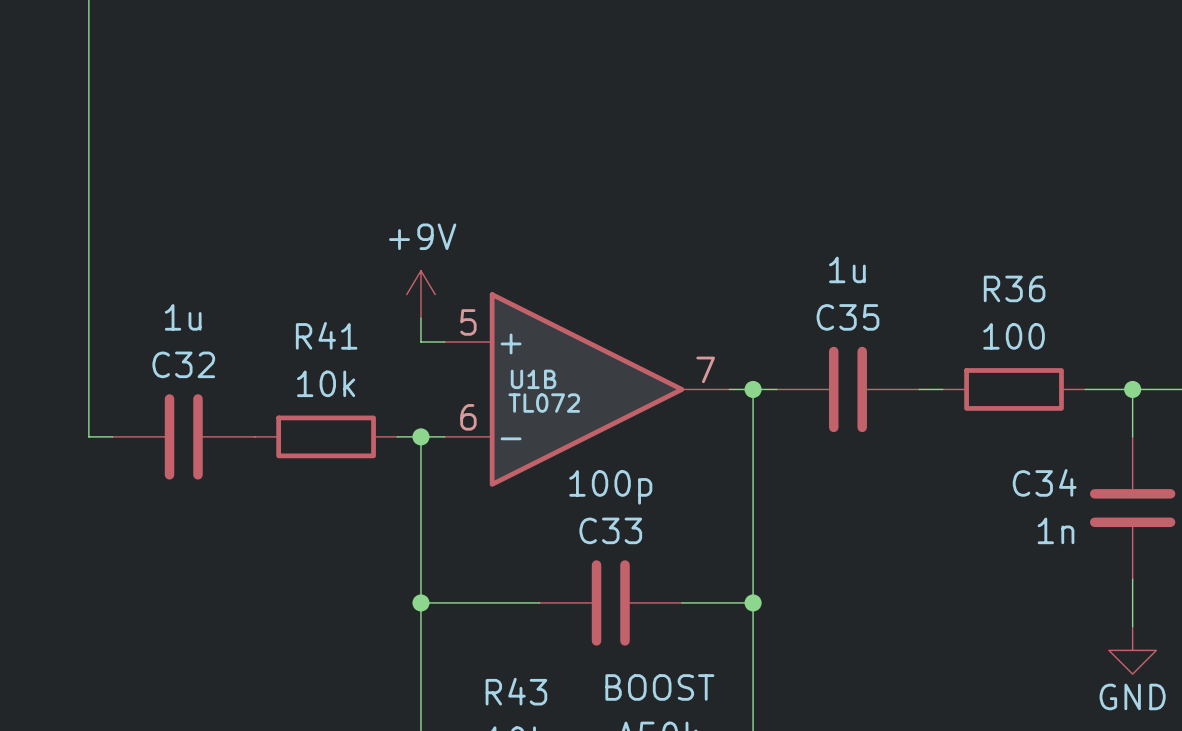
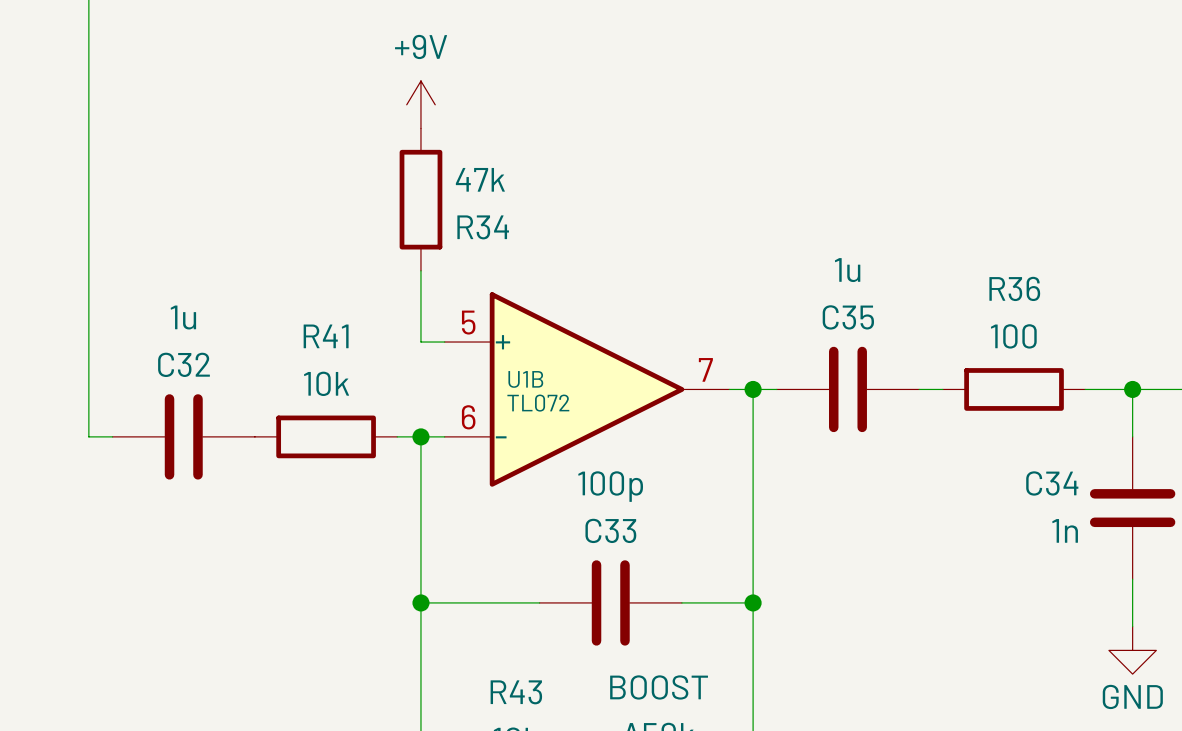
R34: none -> 47k (420, 199)
power symbol position: +9V (420, 294) -> +9V (420, 104)

